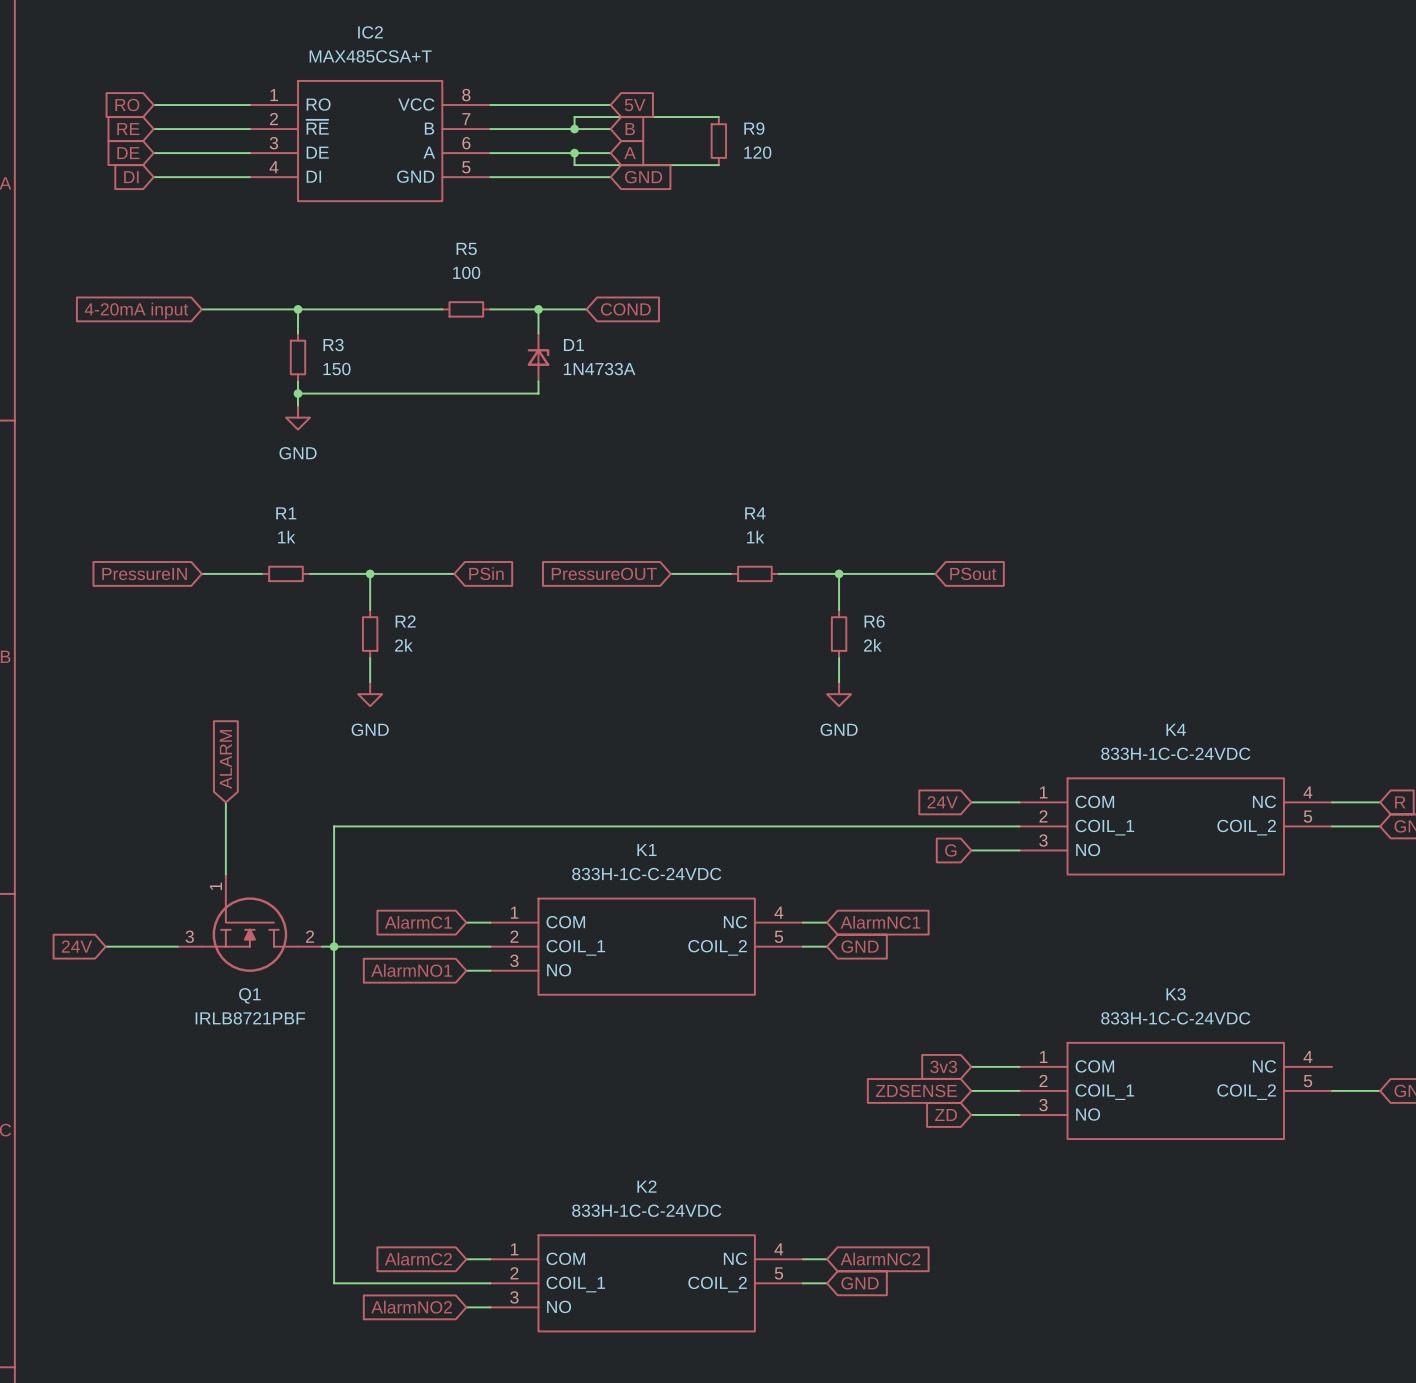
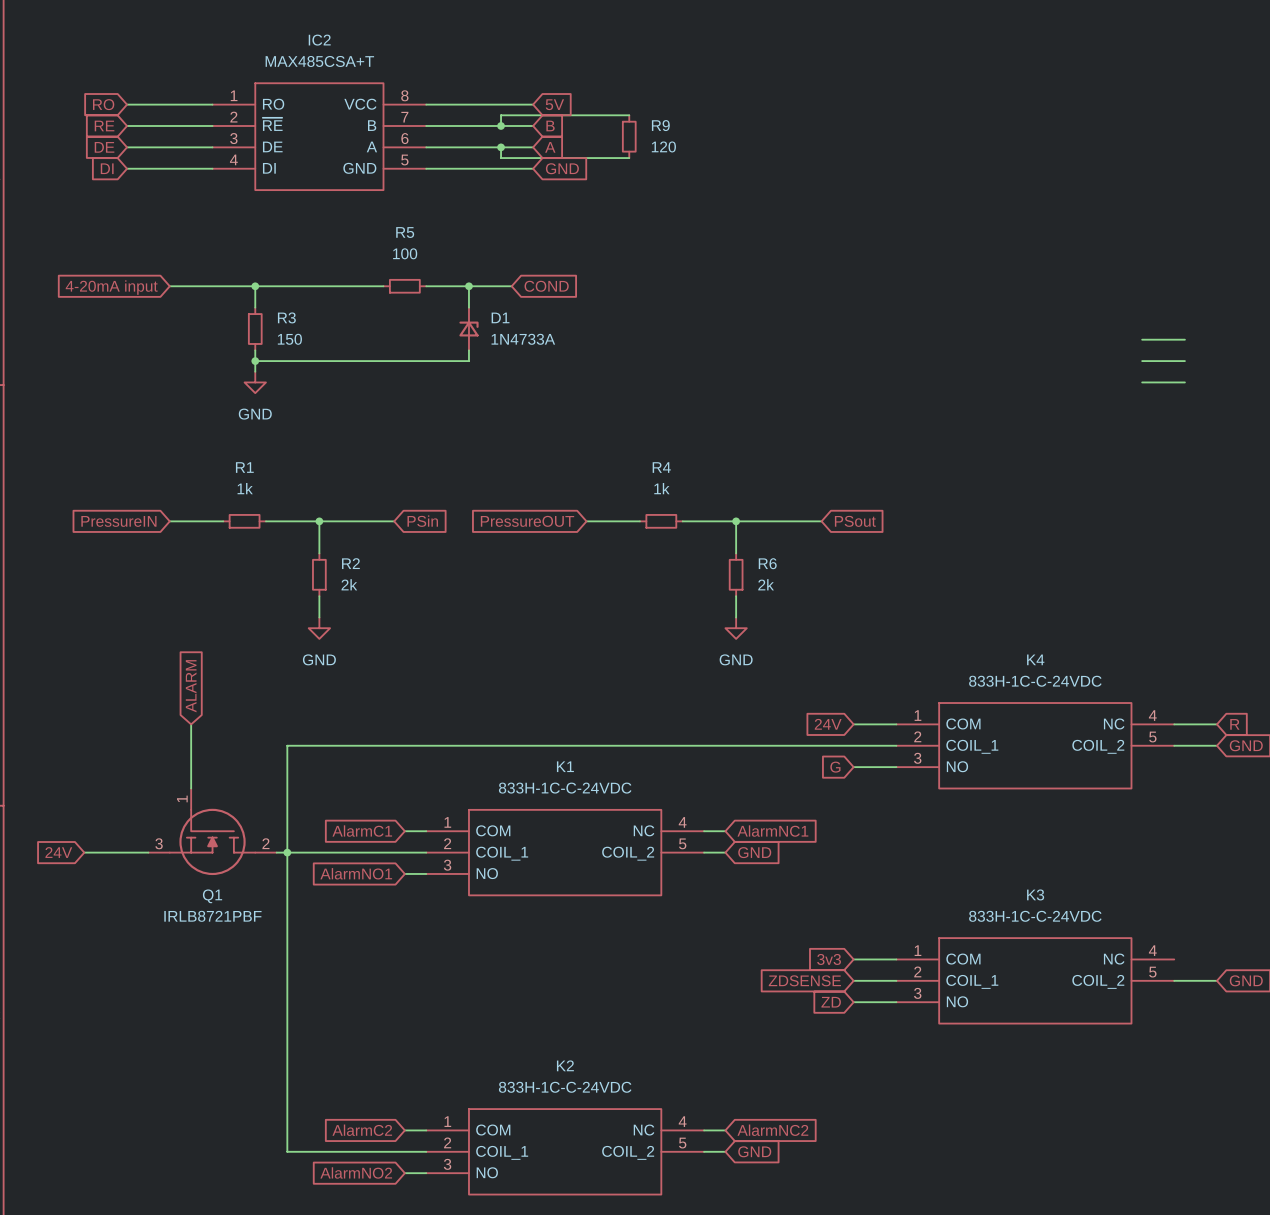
wire: none -> (1142, 339) (1184, 339)
wire: none -> (1142, 361) (1184, 361)
wire: none -> (1142, 382) (1184, 382)

